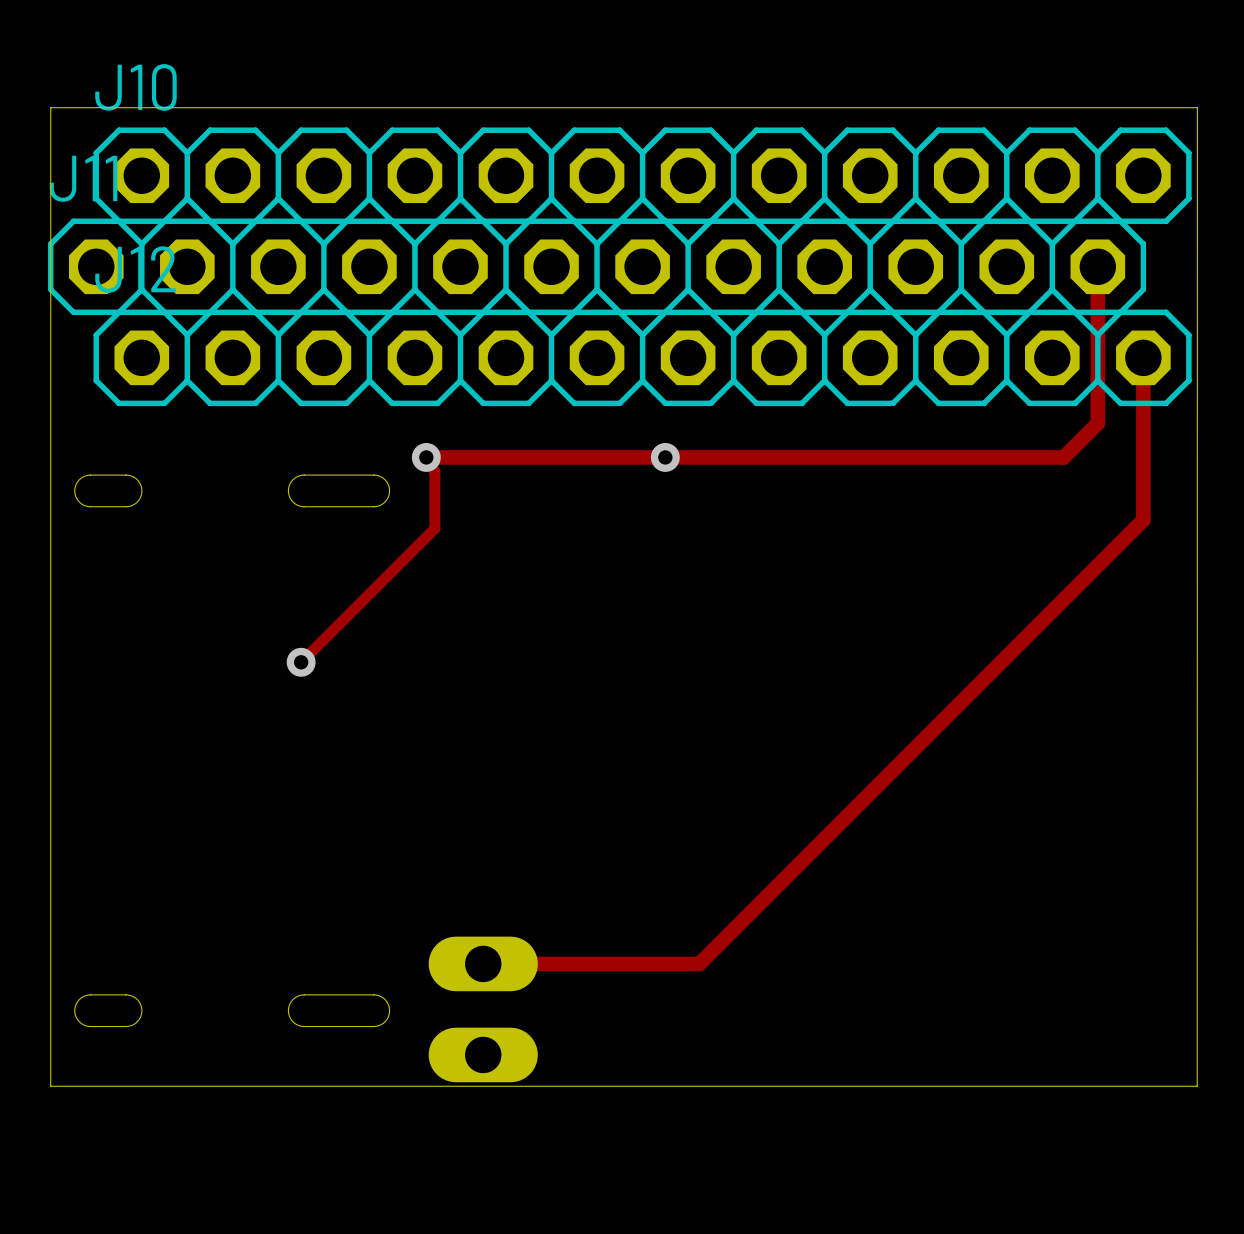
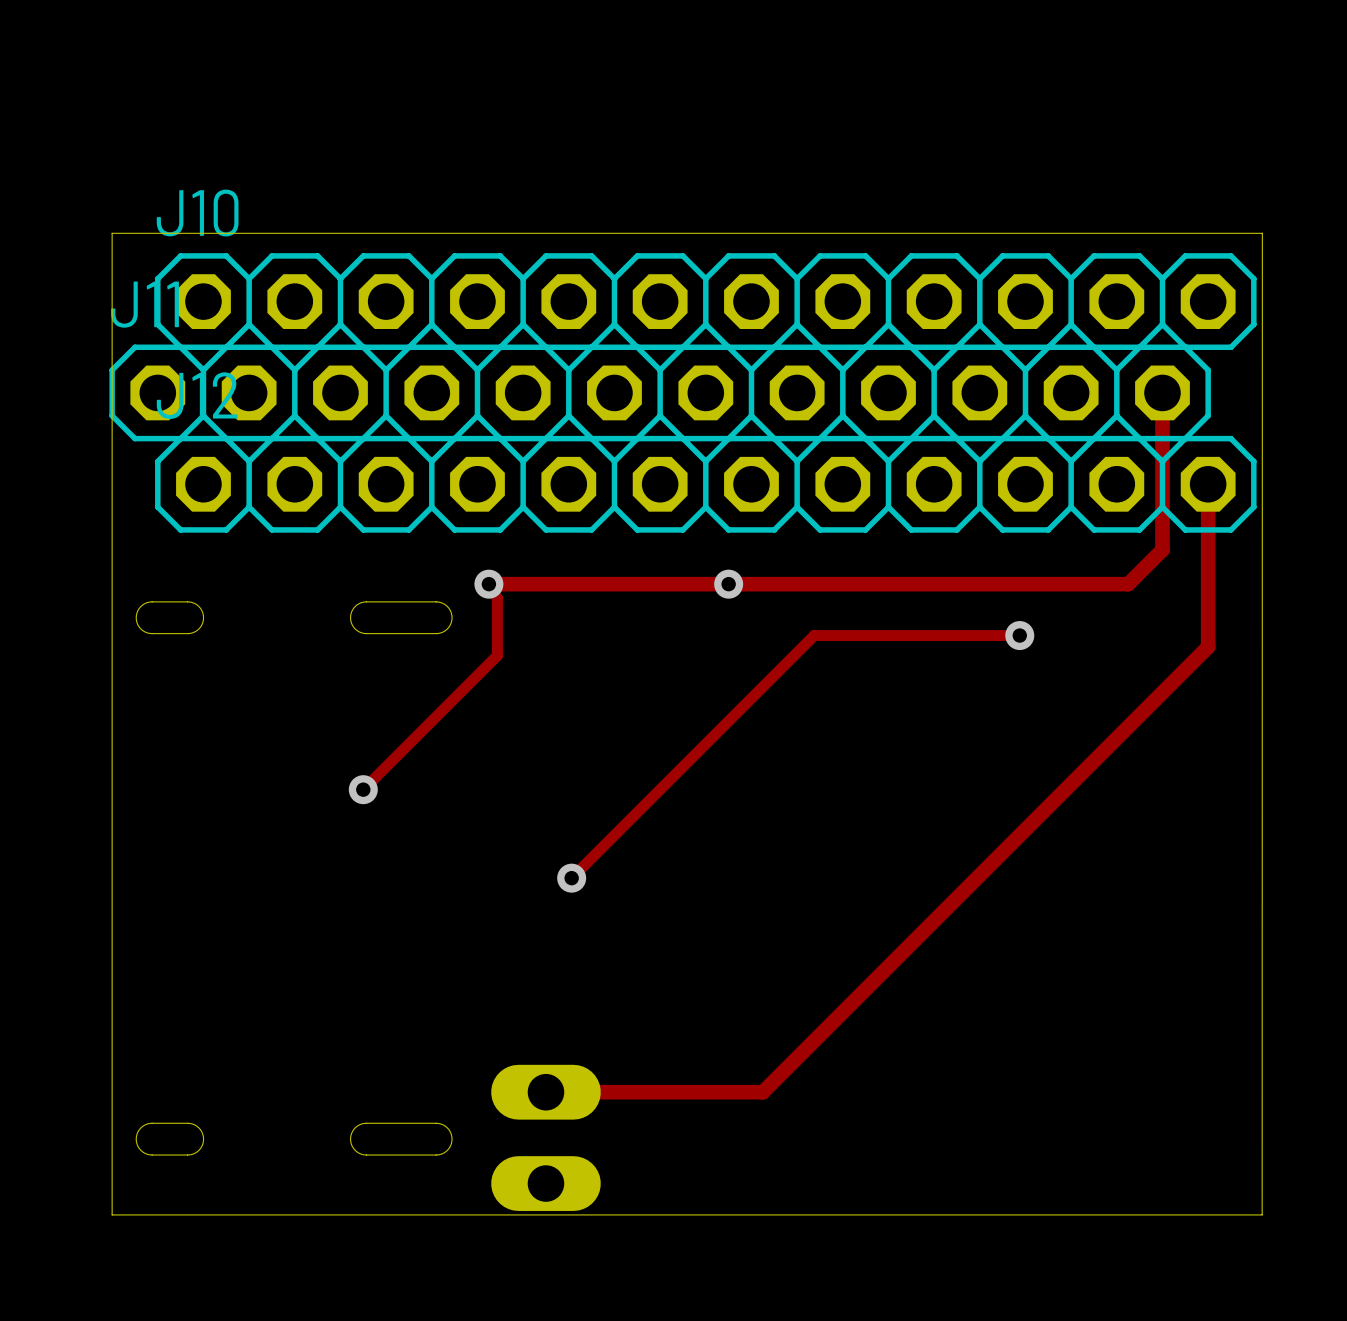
track: none -> (1019, 635) (814, 635) (571, 878)
via: none -> (1019, 635)
via: none -> (571, 878)

